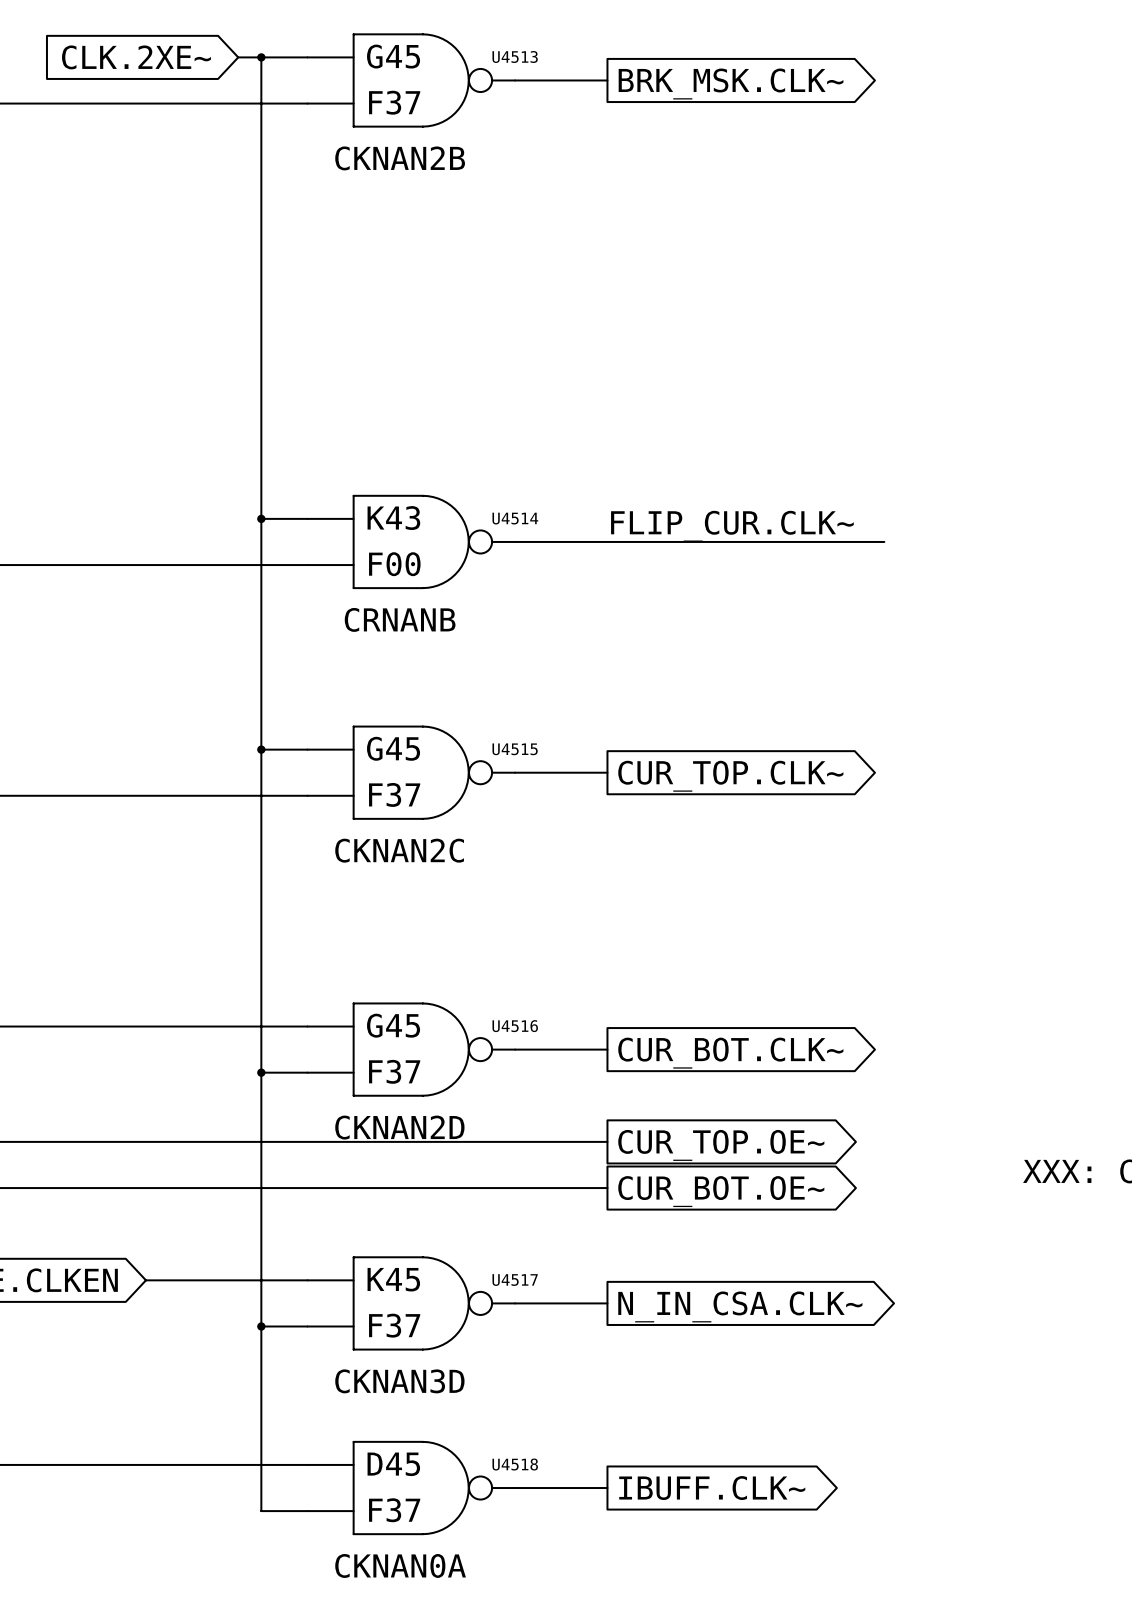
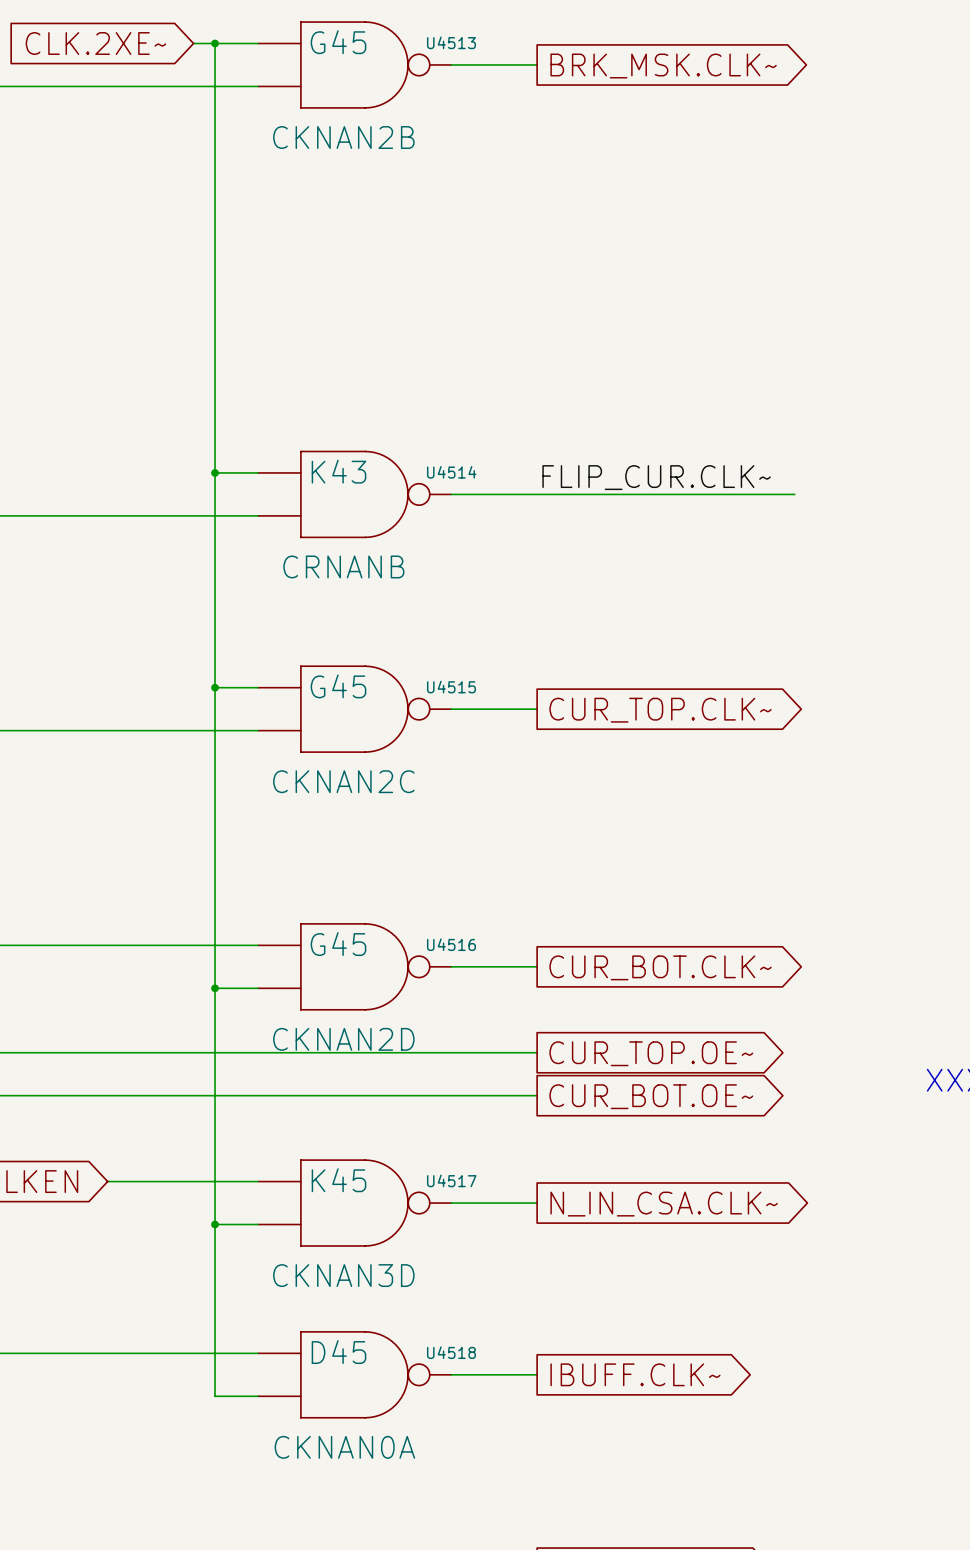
U4513 value: F37 (394, 102) -> none
U4514 value: F00 (394, 564) -> none
U4515 value: F37 (394, 794) -> none
U4516 value: F37 (394, 1071) -> none
U4517 value: F37 (394, 1325) -> none
U4518 value: F37 (394, 1510) -> none

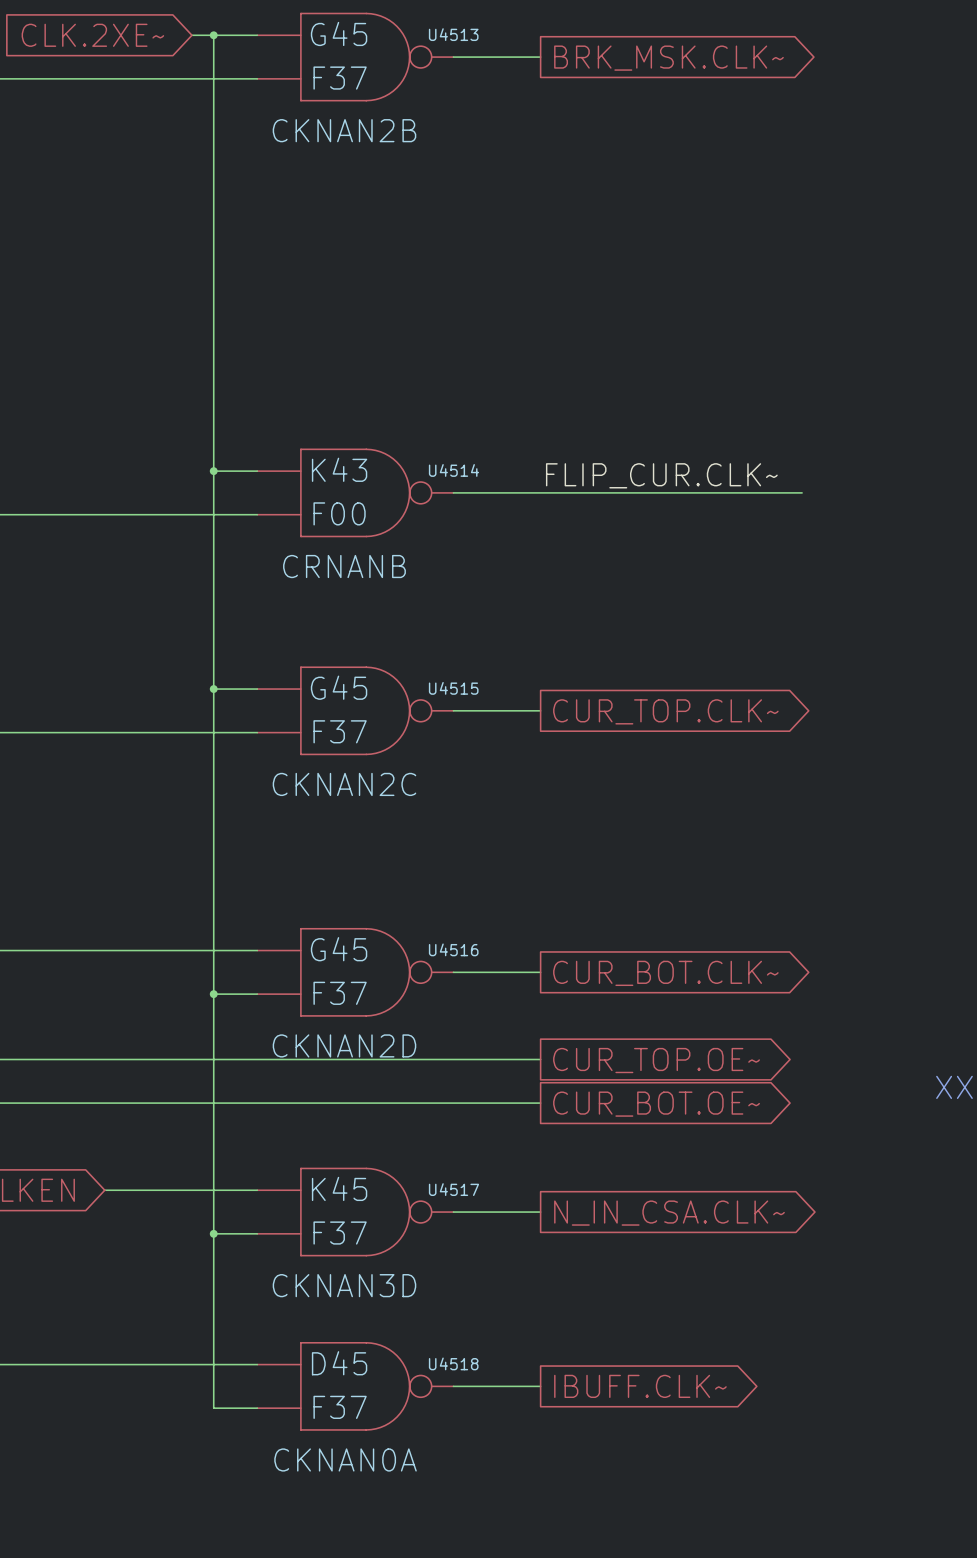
U4513 value: none -> F37 (340, 78)
U4514 value: none -> F00 (339, 513)
U4515 value: none -> F37 (340, 731)
U4516 value: none -> F37 (340, 993)
U4517 value: none -> F37 (340, 1233)
U4518 value: none -> F37 (340, 1407)

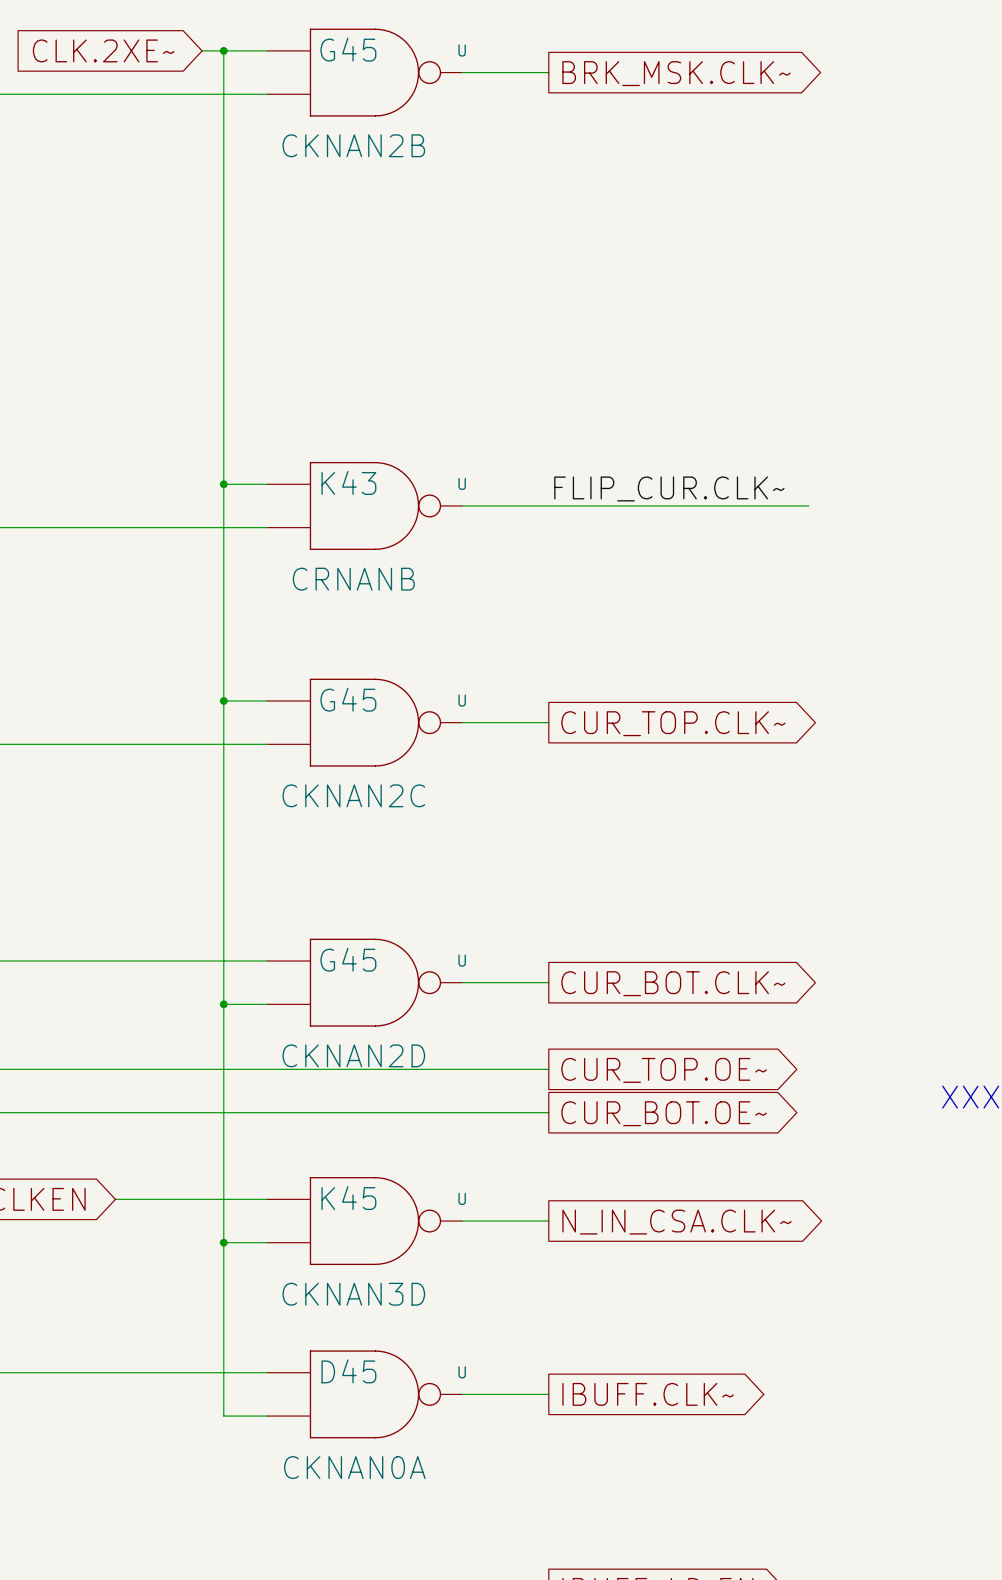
U4513 name: U4513 (453, 34) -> U (462, 50)
U4513 value: F37 (340, 78) -> none
U4514 name: U4514 (453, 470) -> U (462, 483)
U4514 value: F00 (339, 513) -> none
U4515 name: U4515 (453, 688) -> U (462, 700)
U4515 value: F37 (340, 731) -> none
U4516 name: U4516 (453, 949) -> U (462, 960)
U4516 value: F37 (340, 993) -> none
U4517 name: U4517 (453, 1189) -> U (462, 1198)
U4517 value: F37 (340, 1233) -> none
U4518 name: U4518 (453, 1363) -> U (462, 1372)
U4518 value: F37 (340, 1407) -> none

